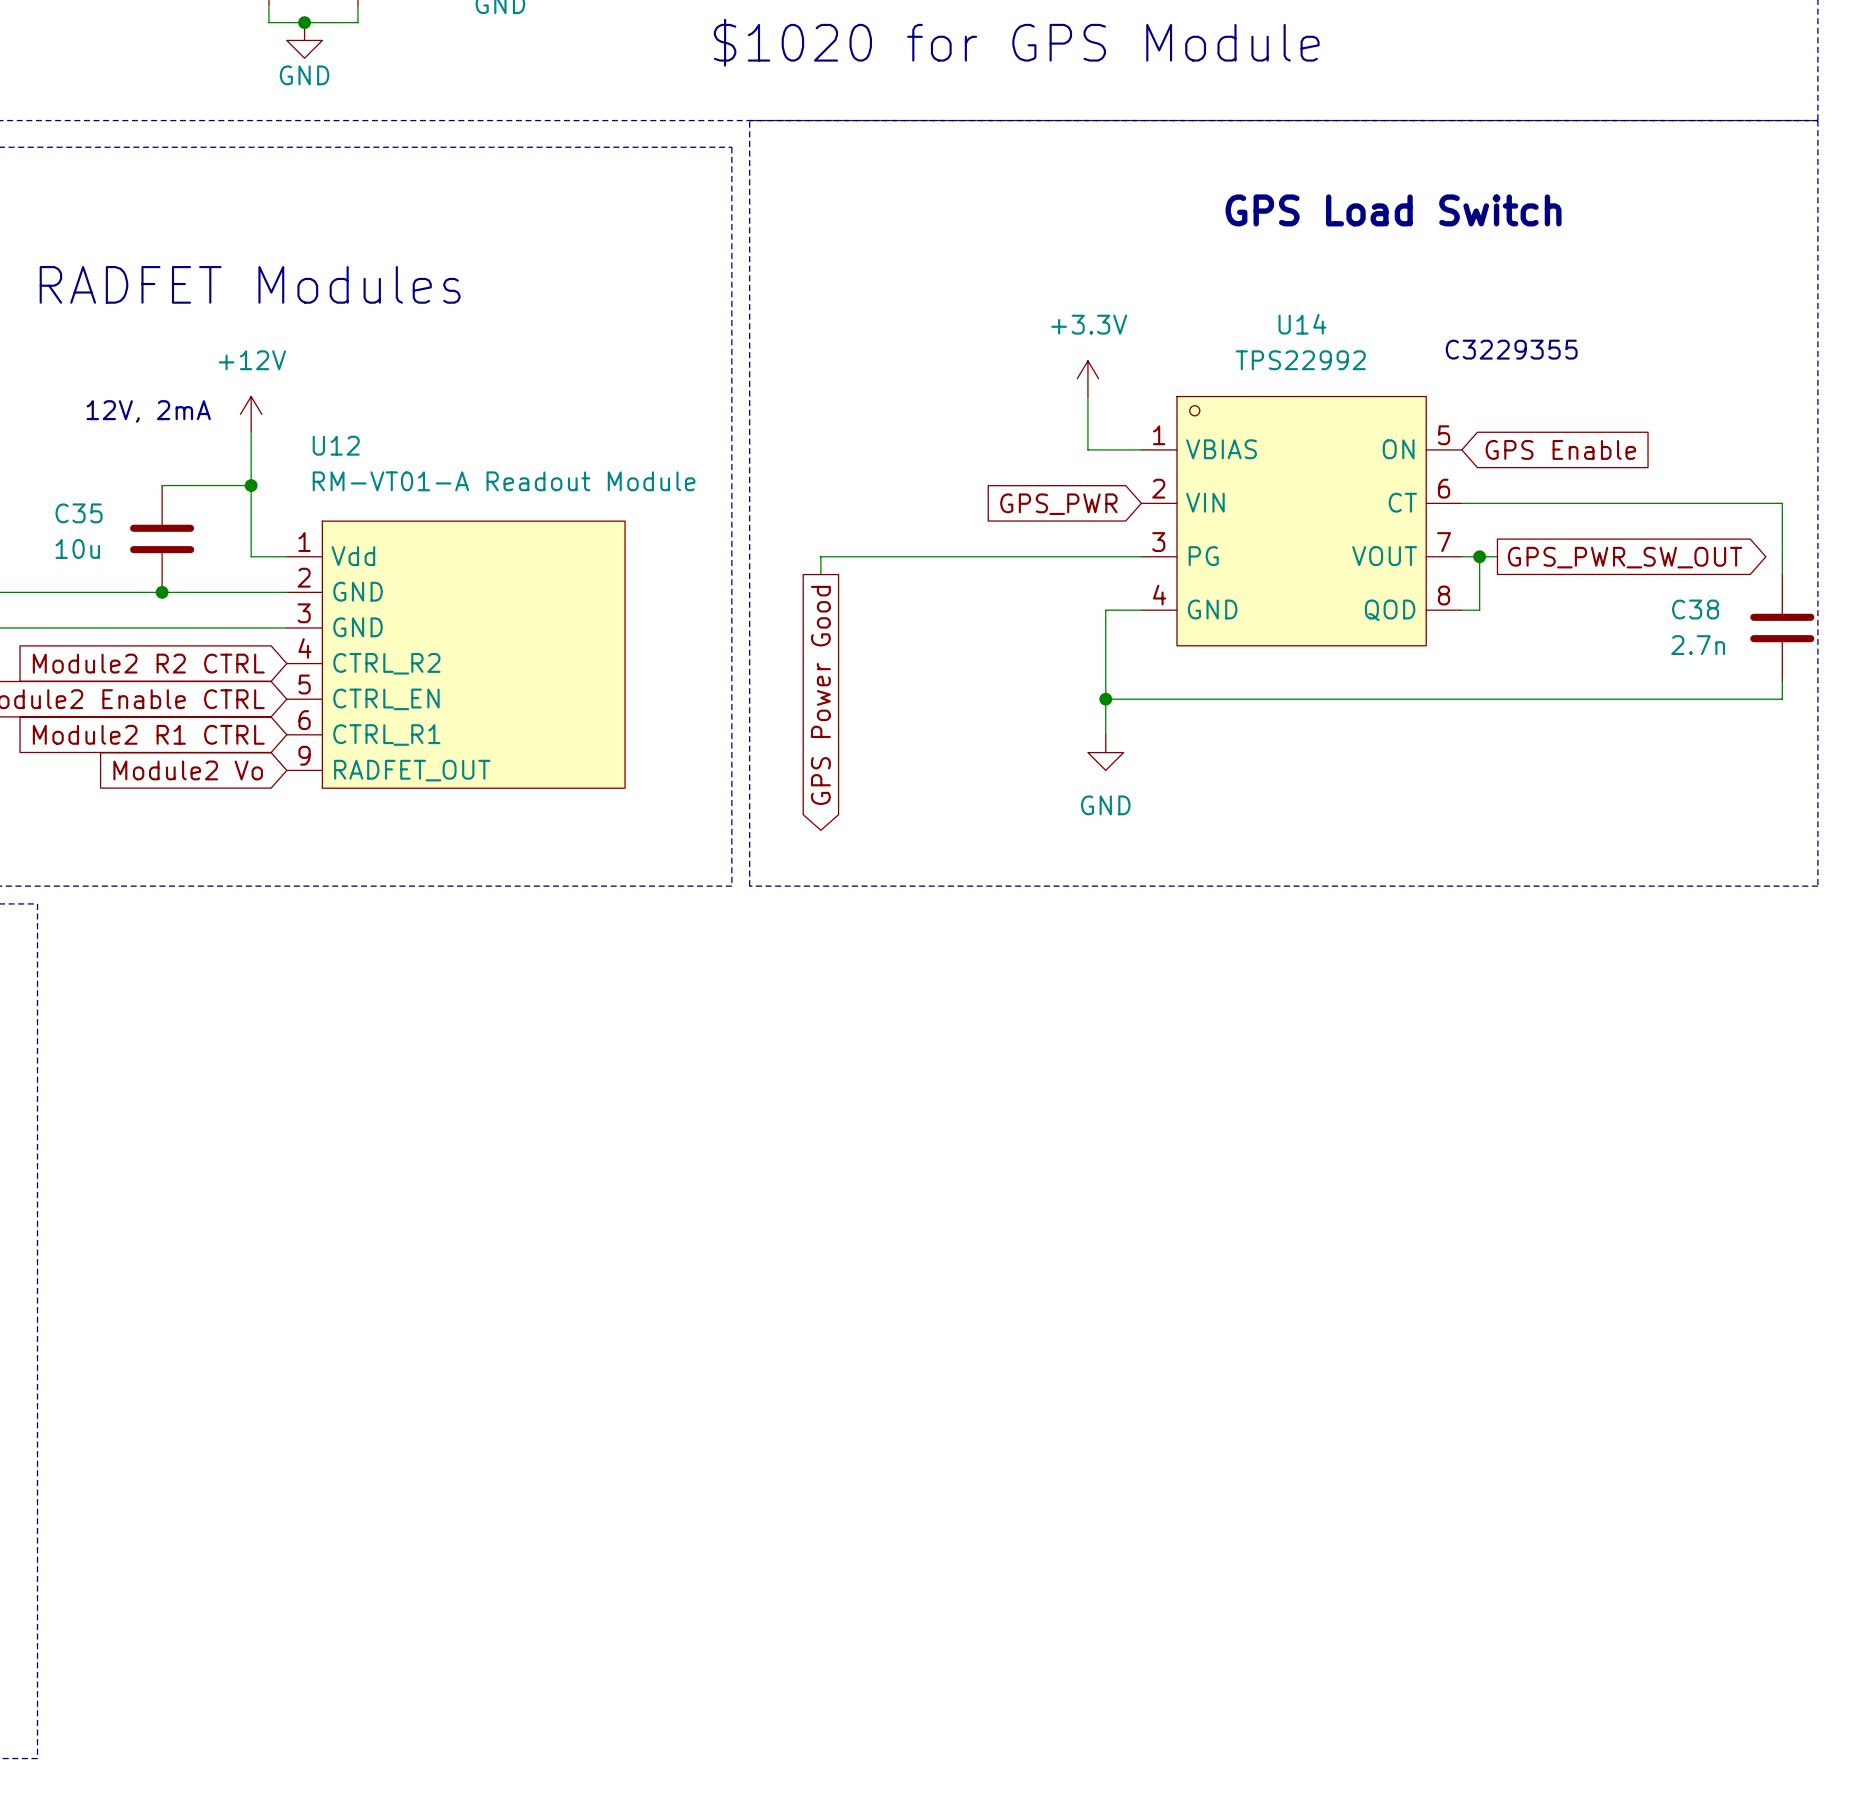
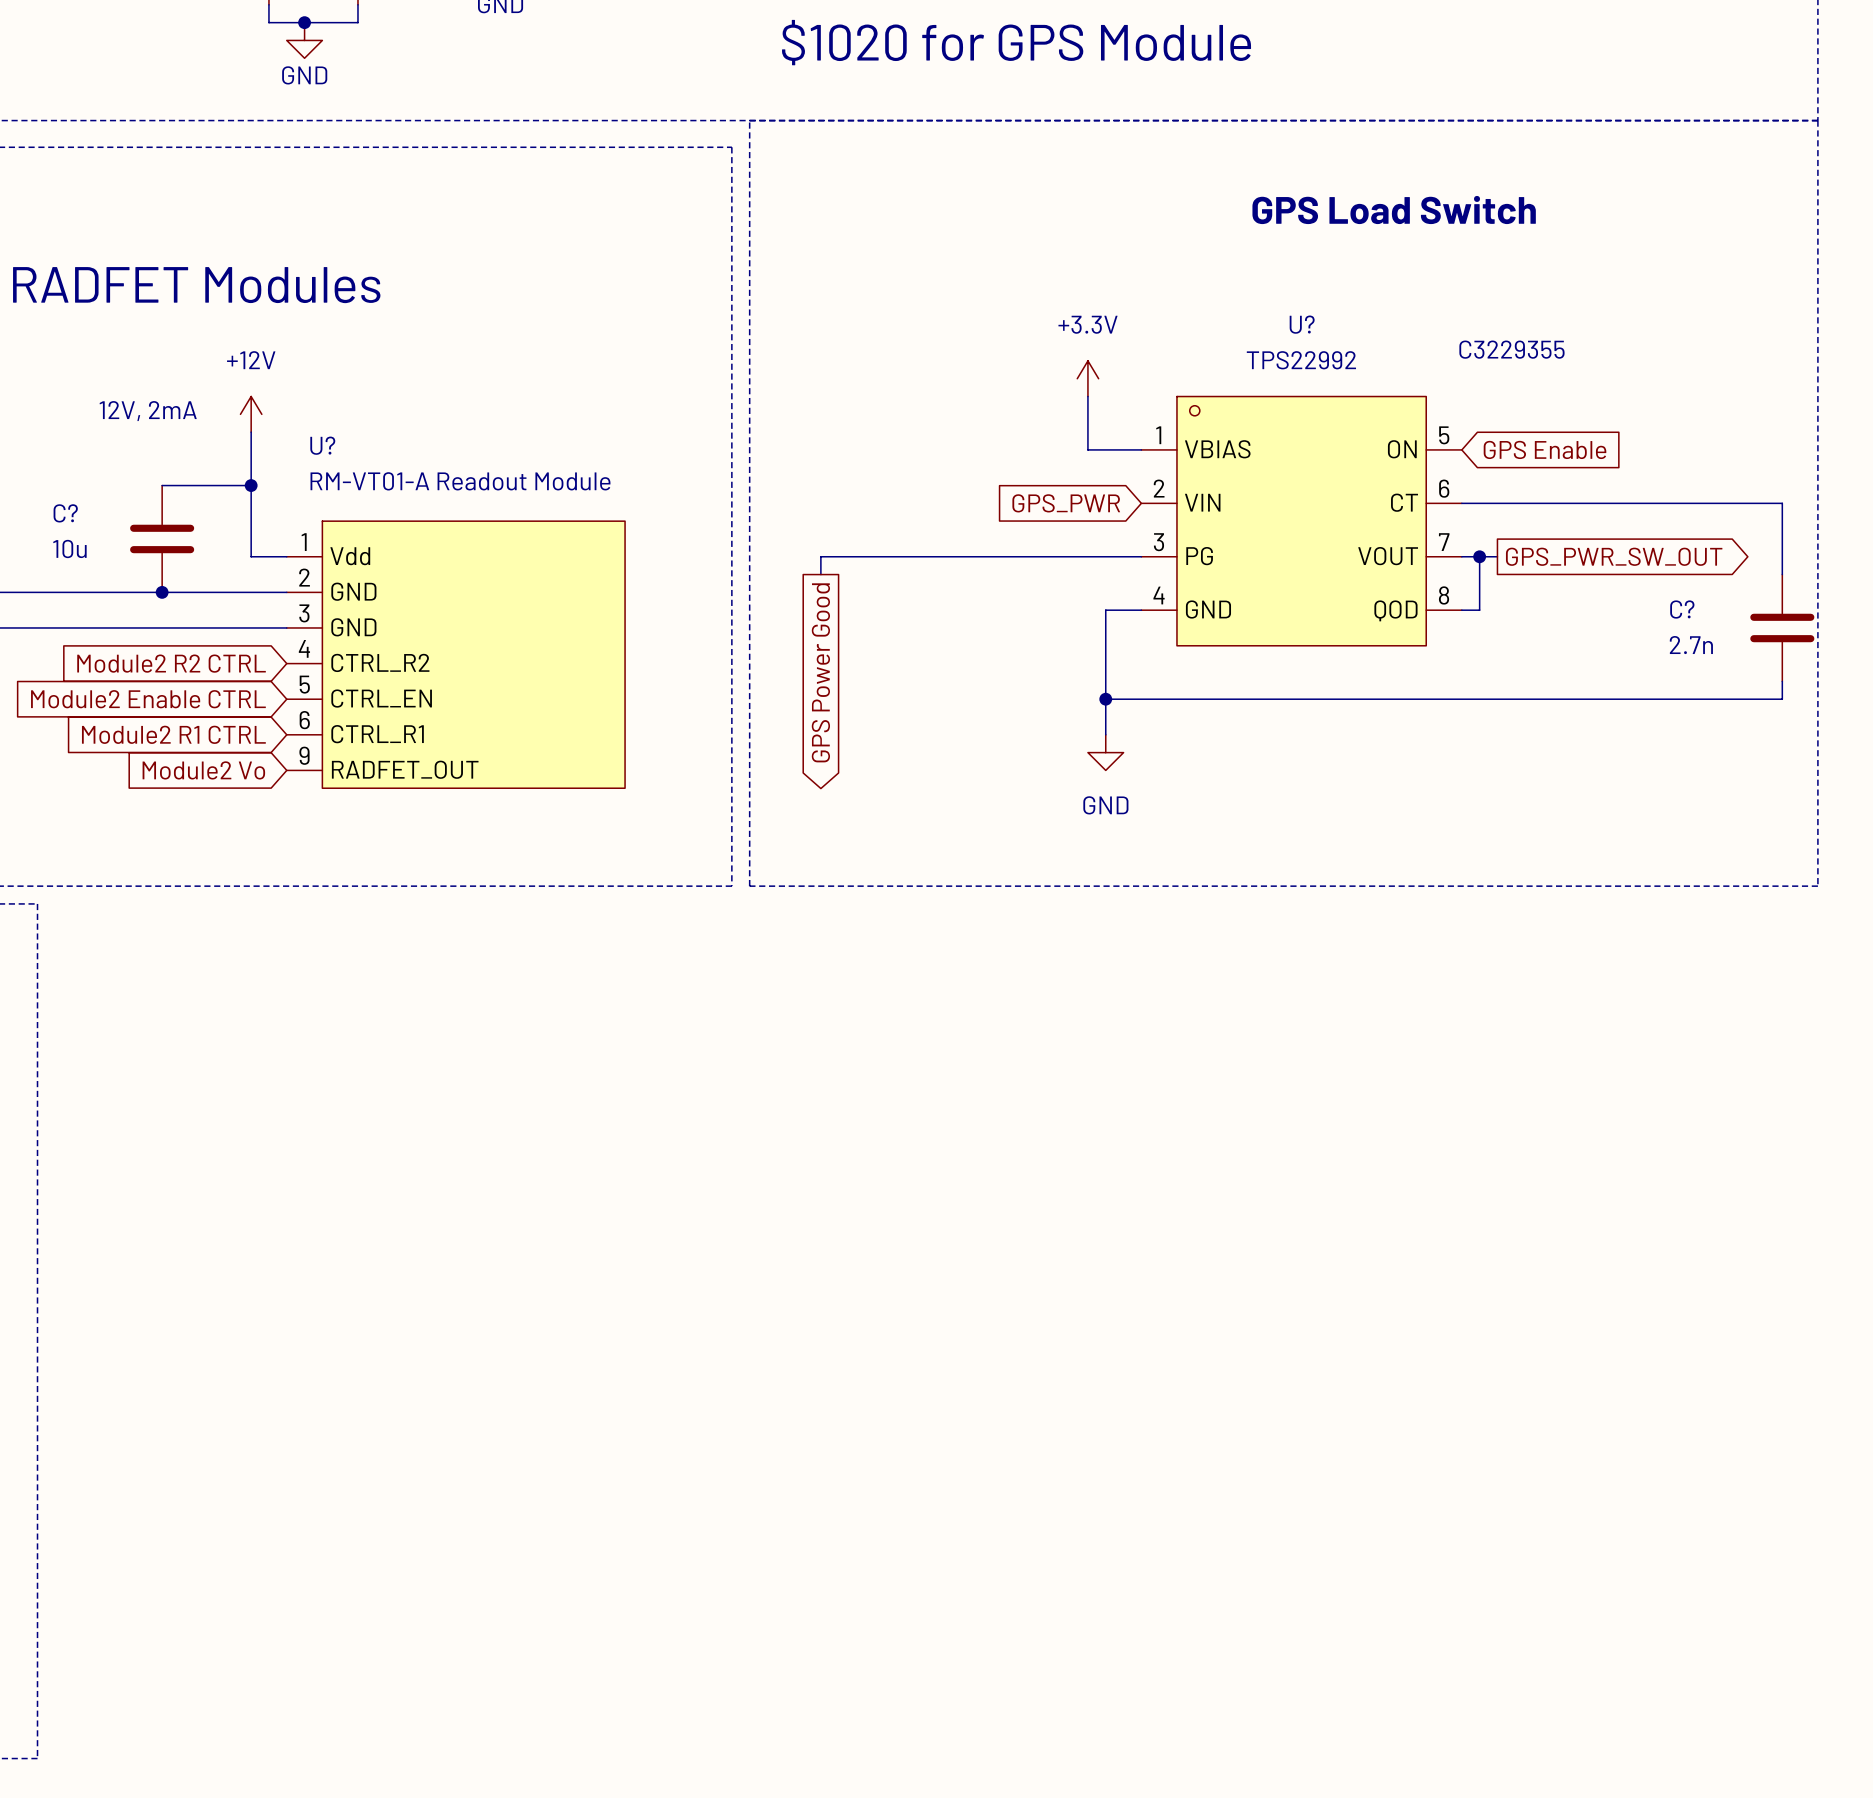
U14 name: U14 (1302, 324) -> U? (1302, 324)
U12 name: U12 (336, 445) -> U? (322, 445)
C35 name: C35 (79, 513) -> C? (65, 513)
C38 name: C38 (1695, 609) -> C? (1682, 609)

